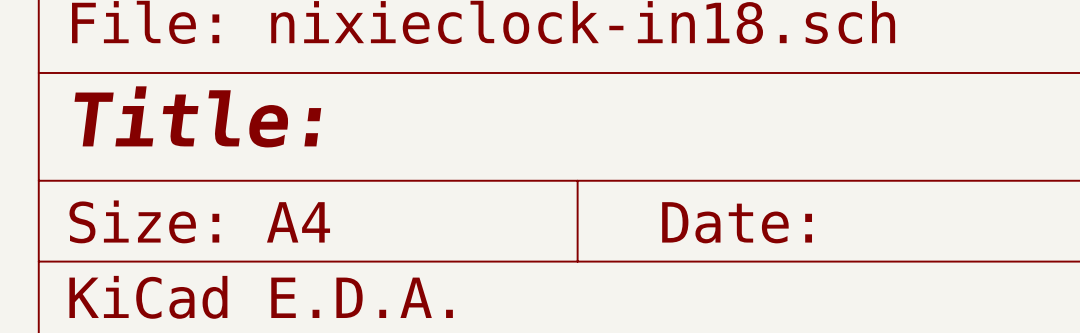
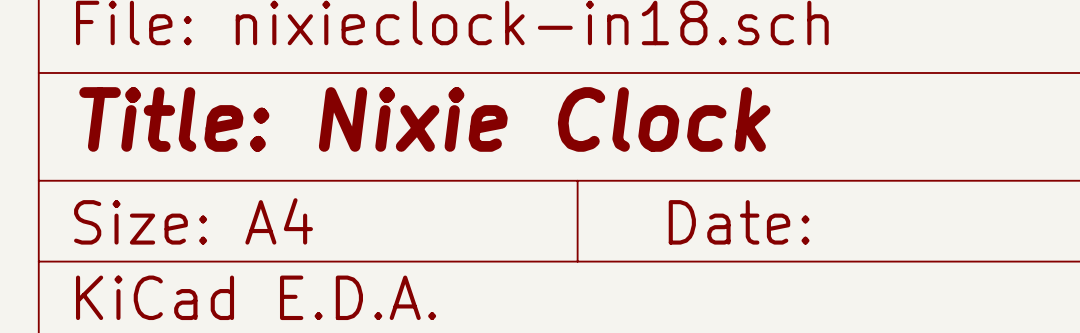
title block: Title: (197, 116) -> Title: Nixie Clock (424, 119)

